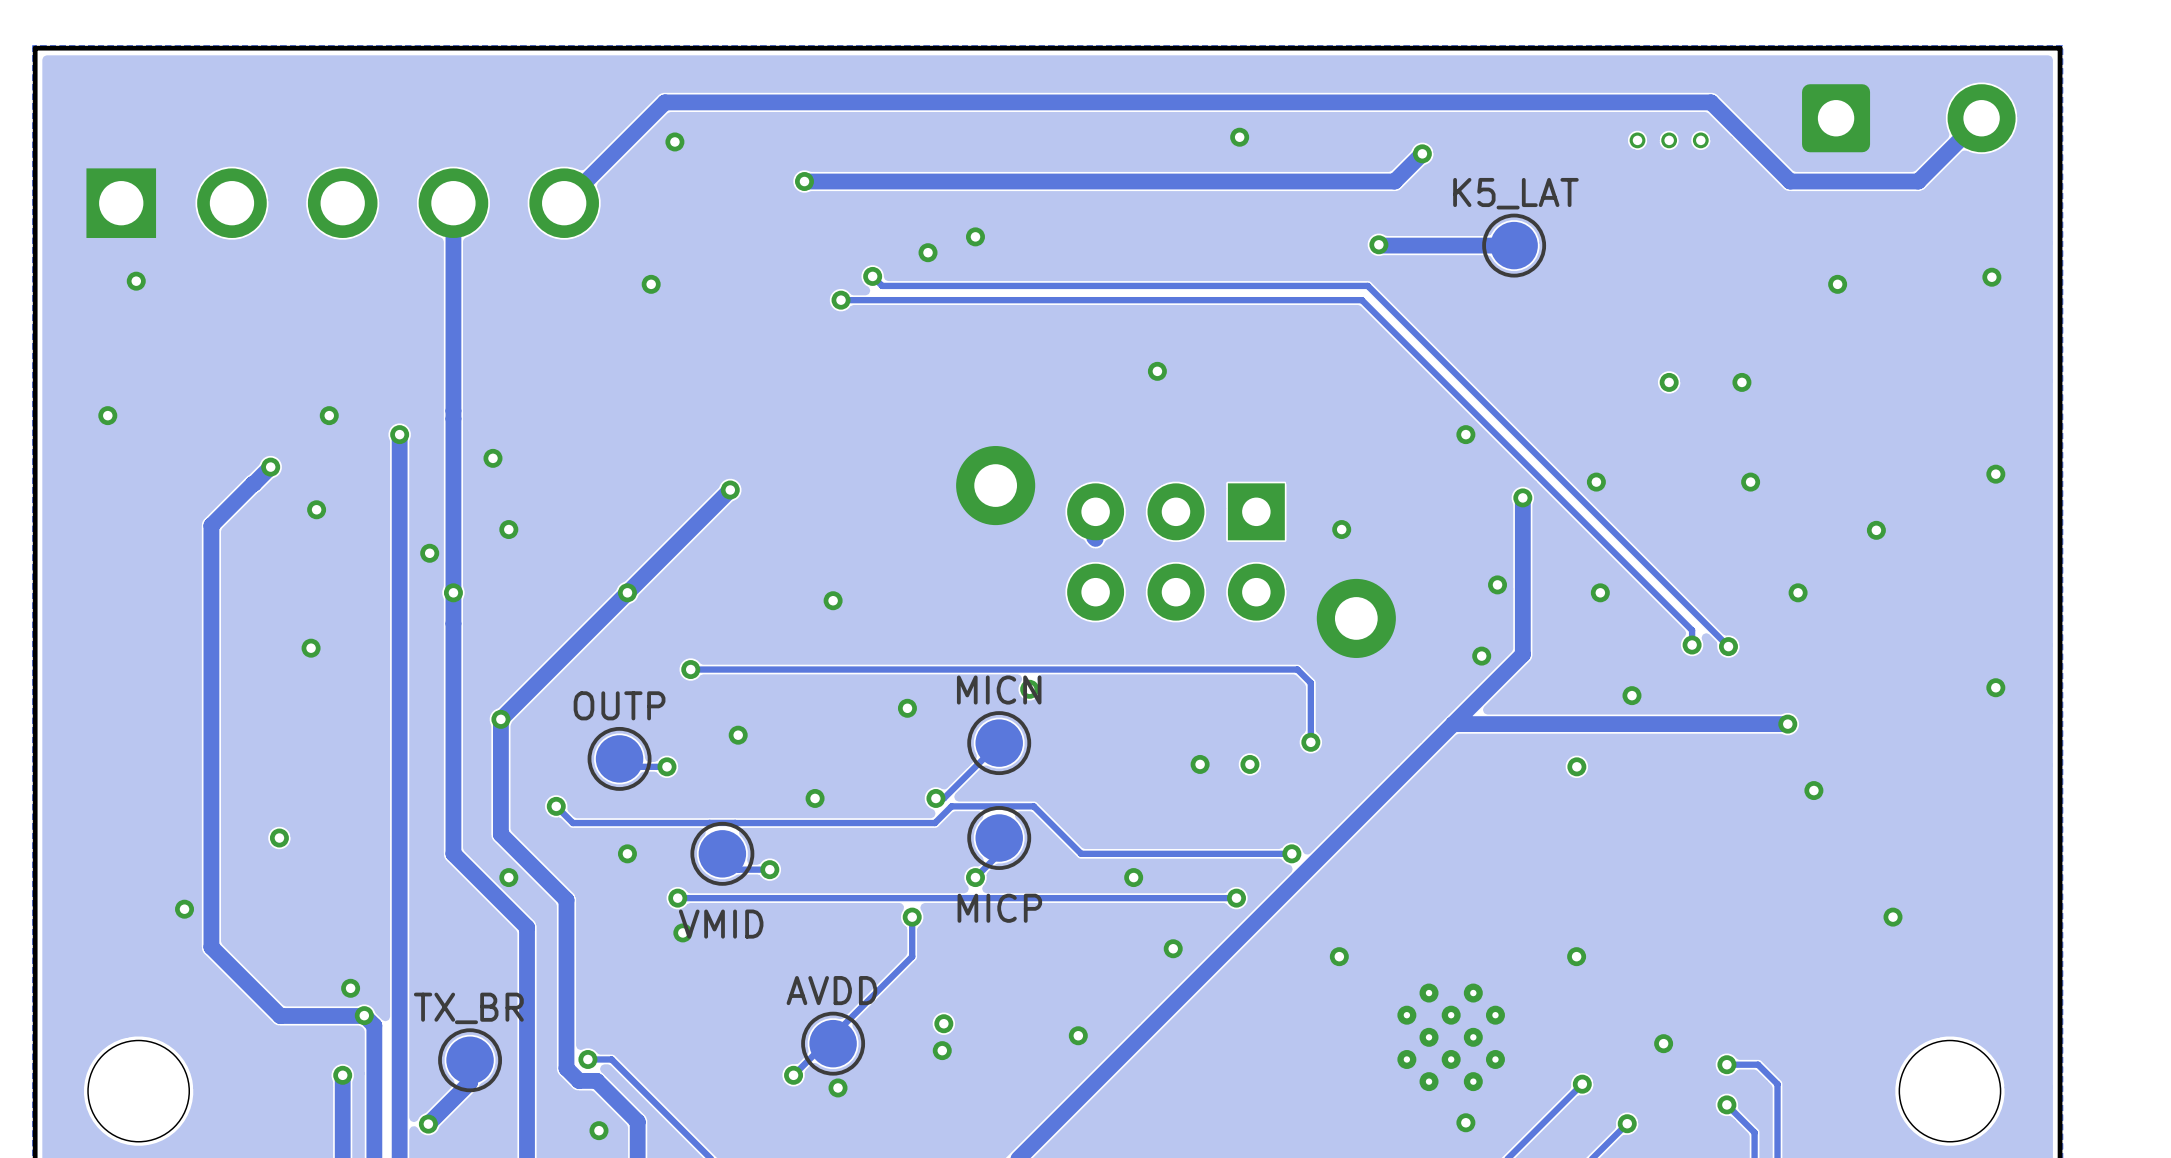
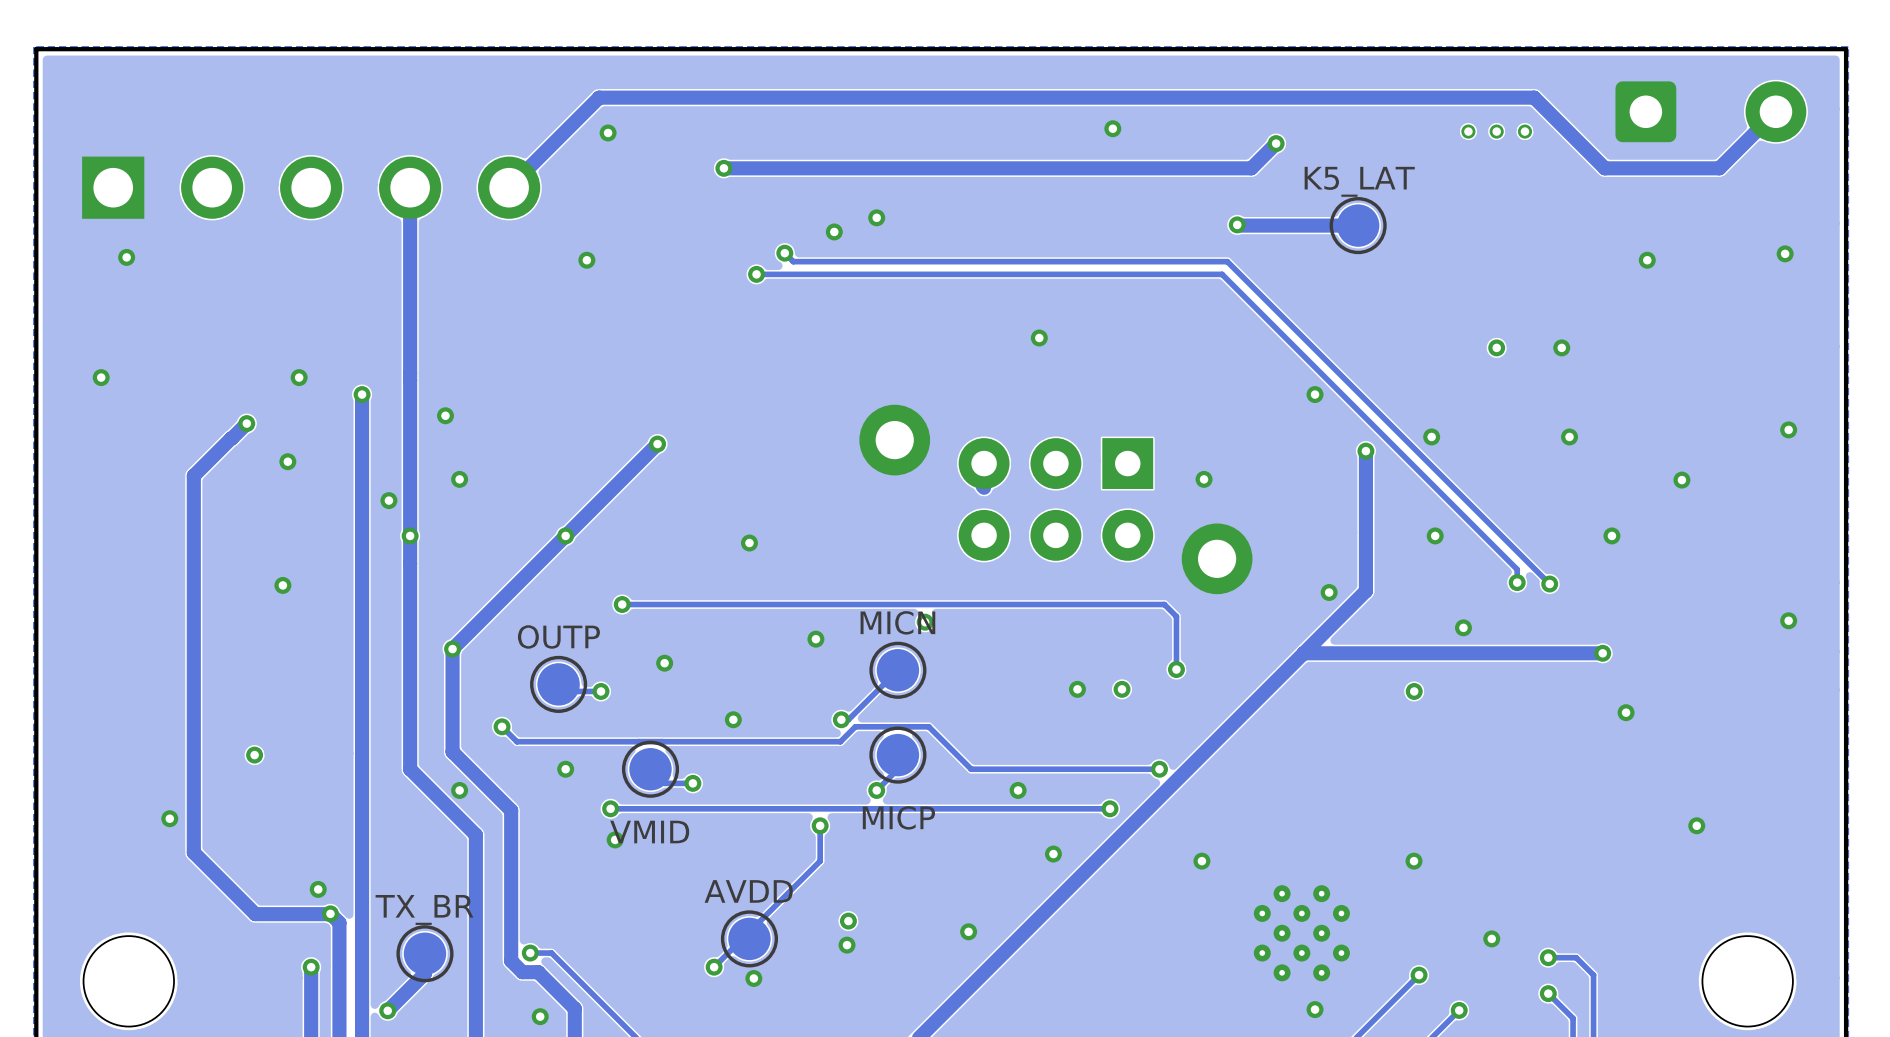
via: (1497, 584) -> none

